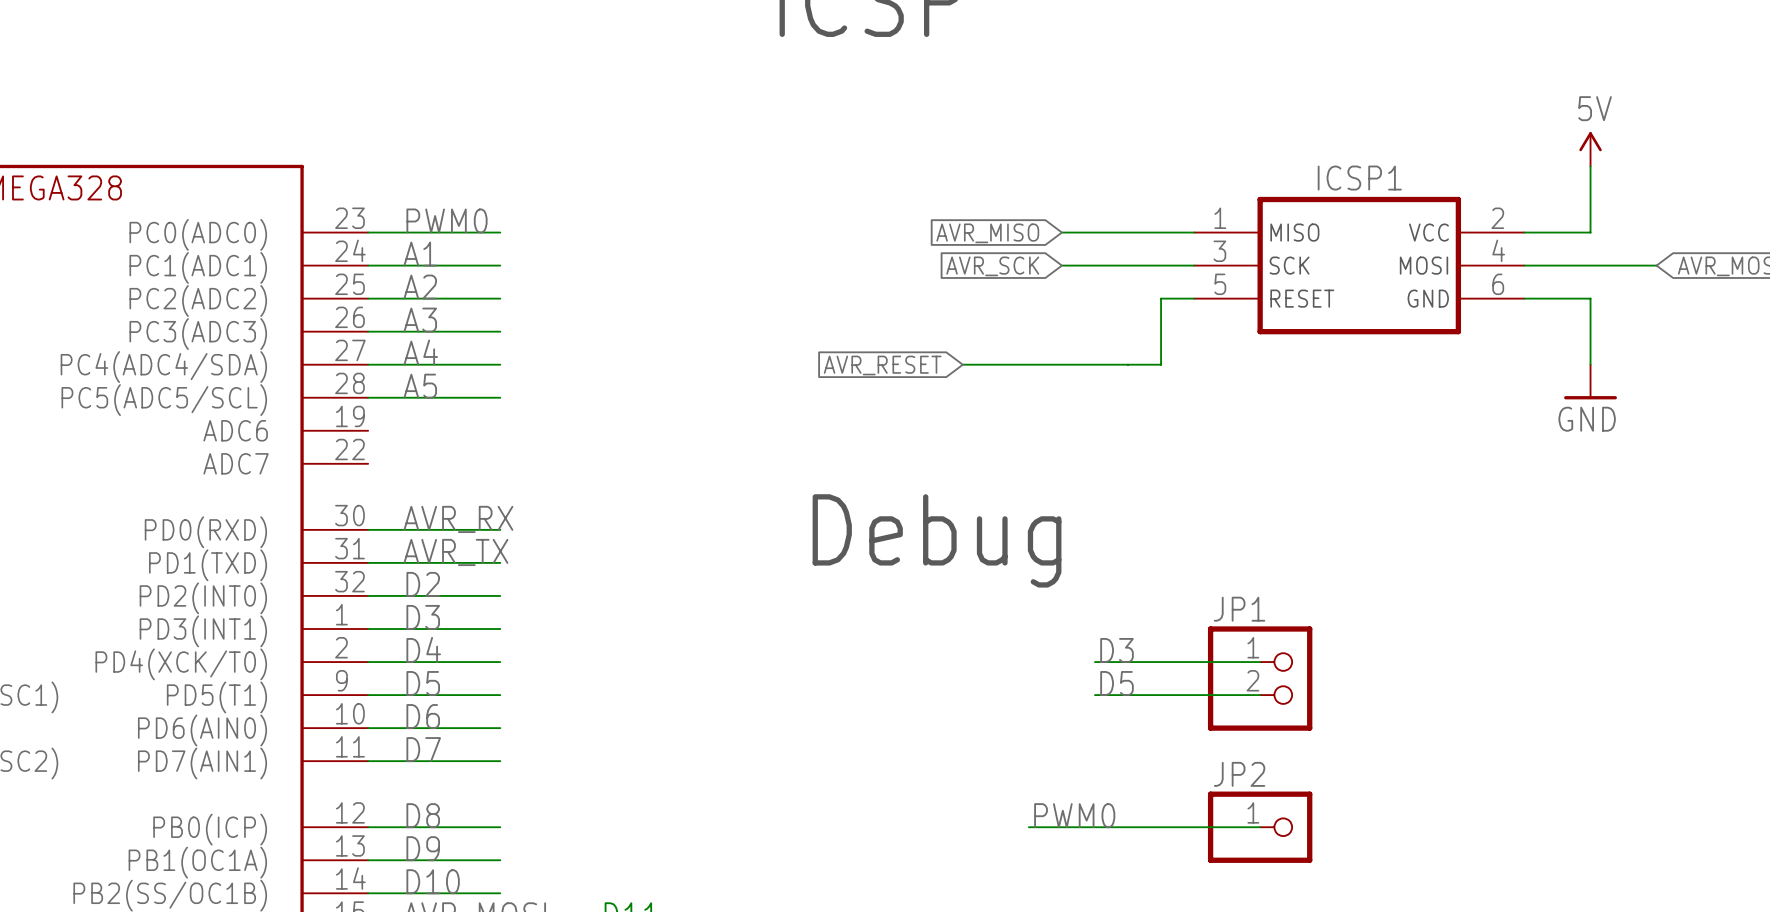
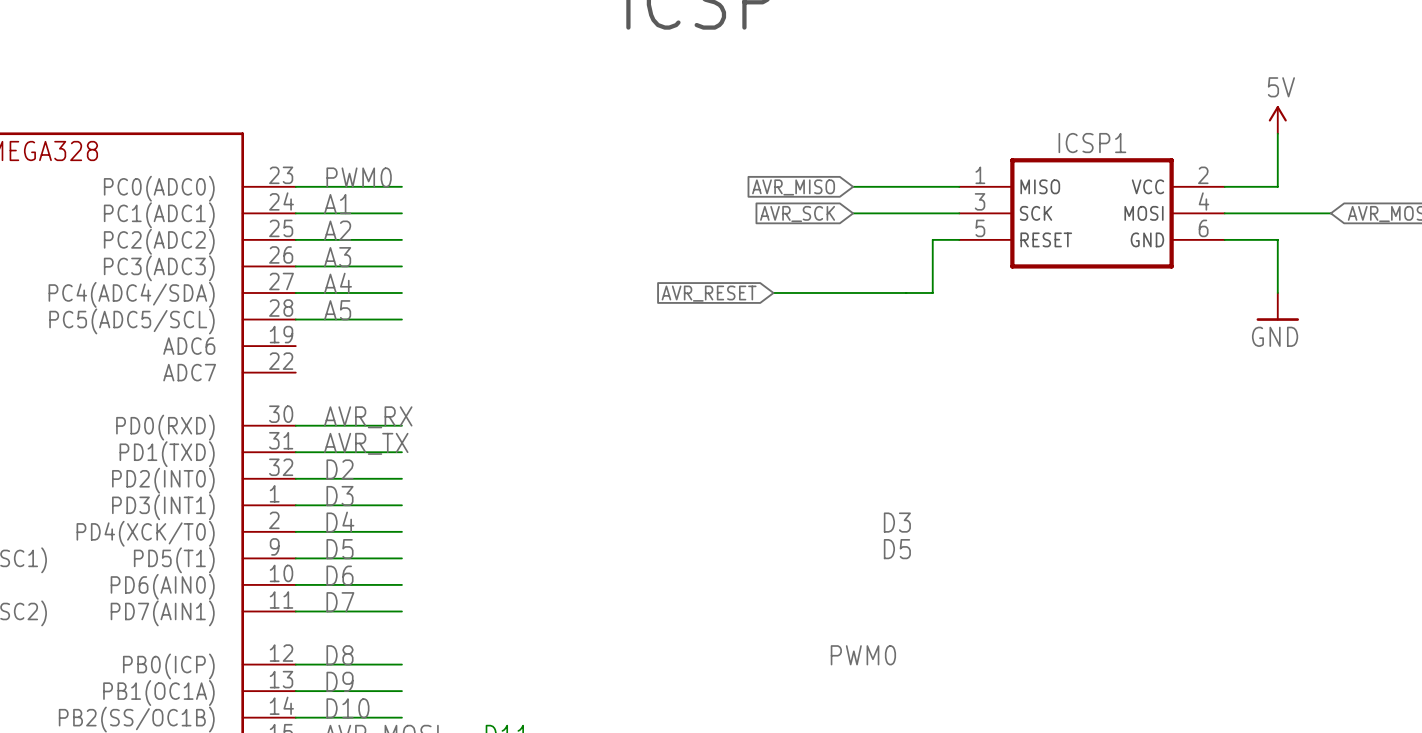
text: Debug (937, 540) -> none
wire: (1094, 662) (1260, 662) -> none
JP1: (1260, 678) -> none
wire: (1094, 695) (1260, 695) -> none
wire: (1028, 827) (1260, 827) -> none
JP2: (1260, 827) -> none

